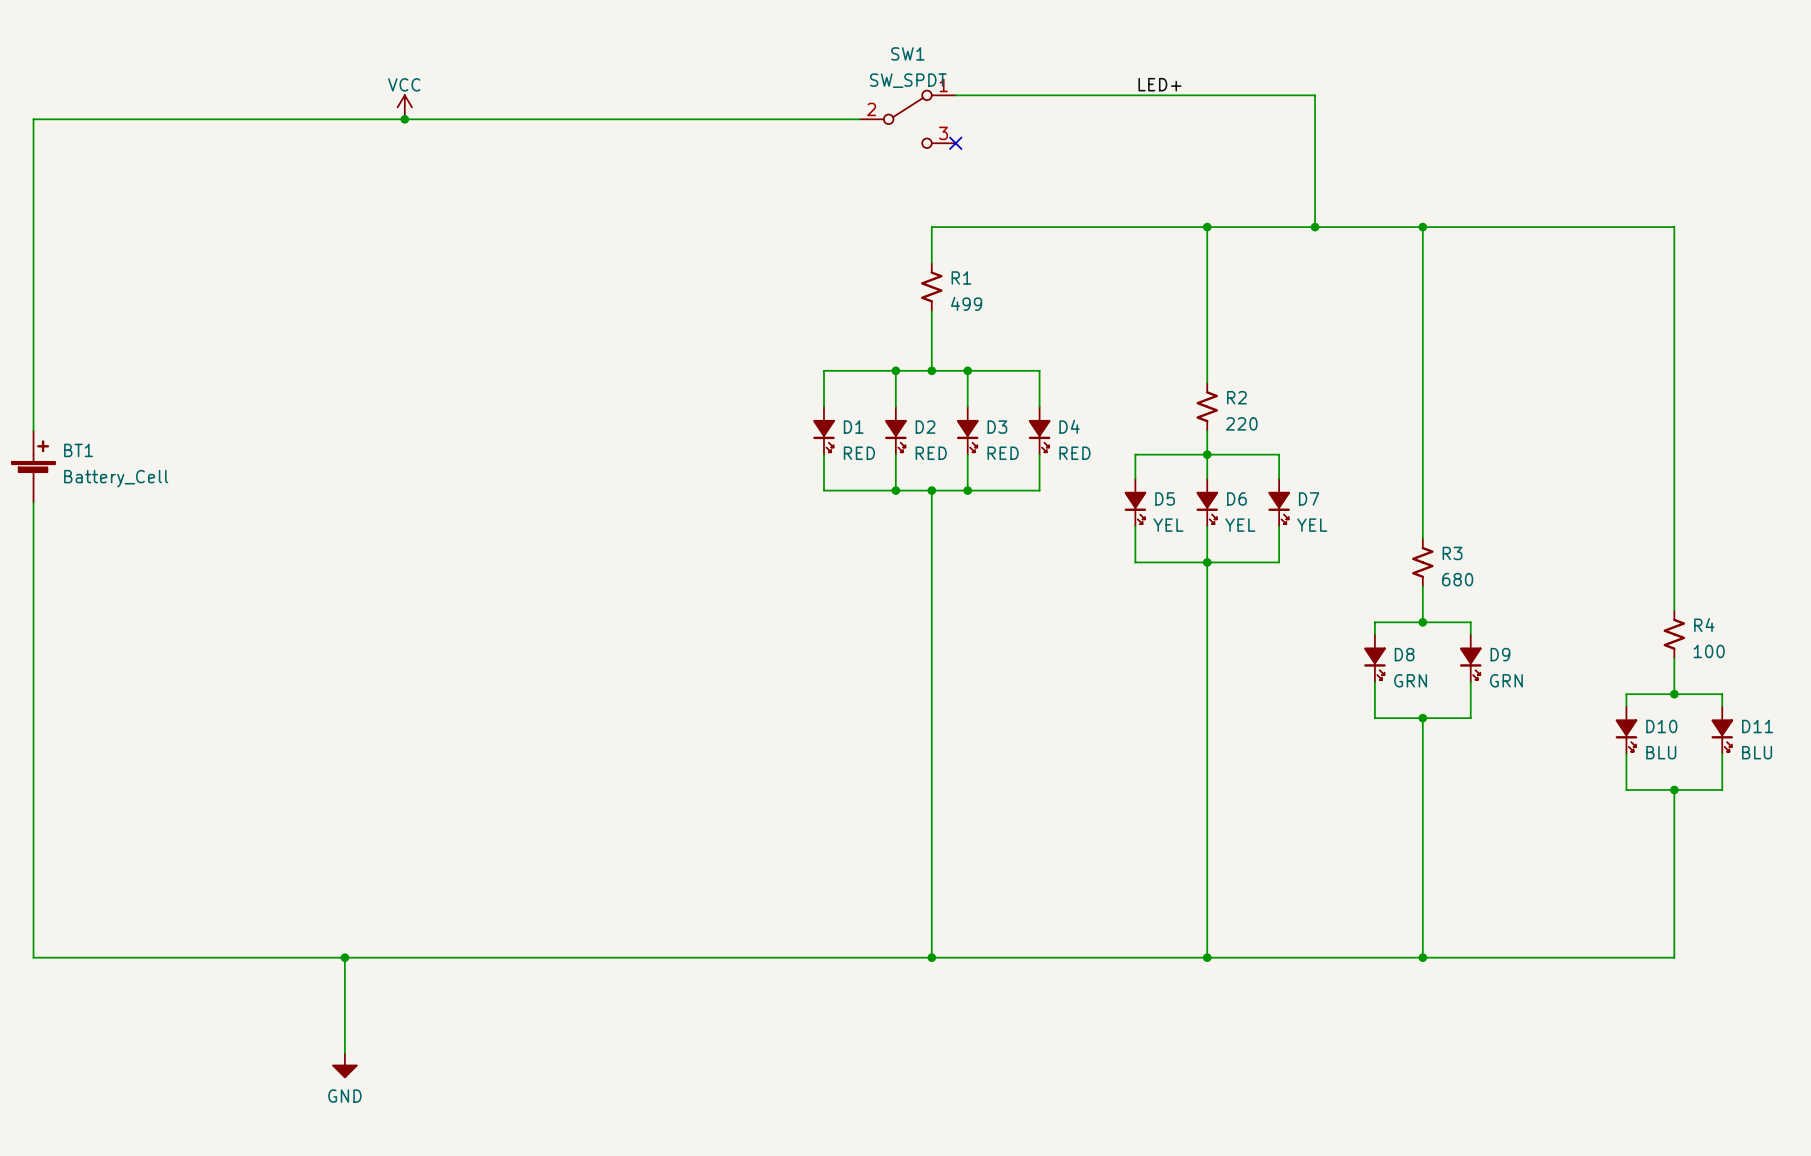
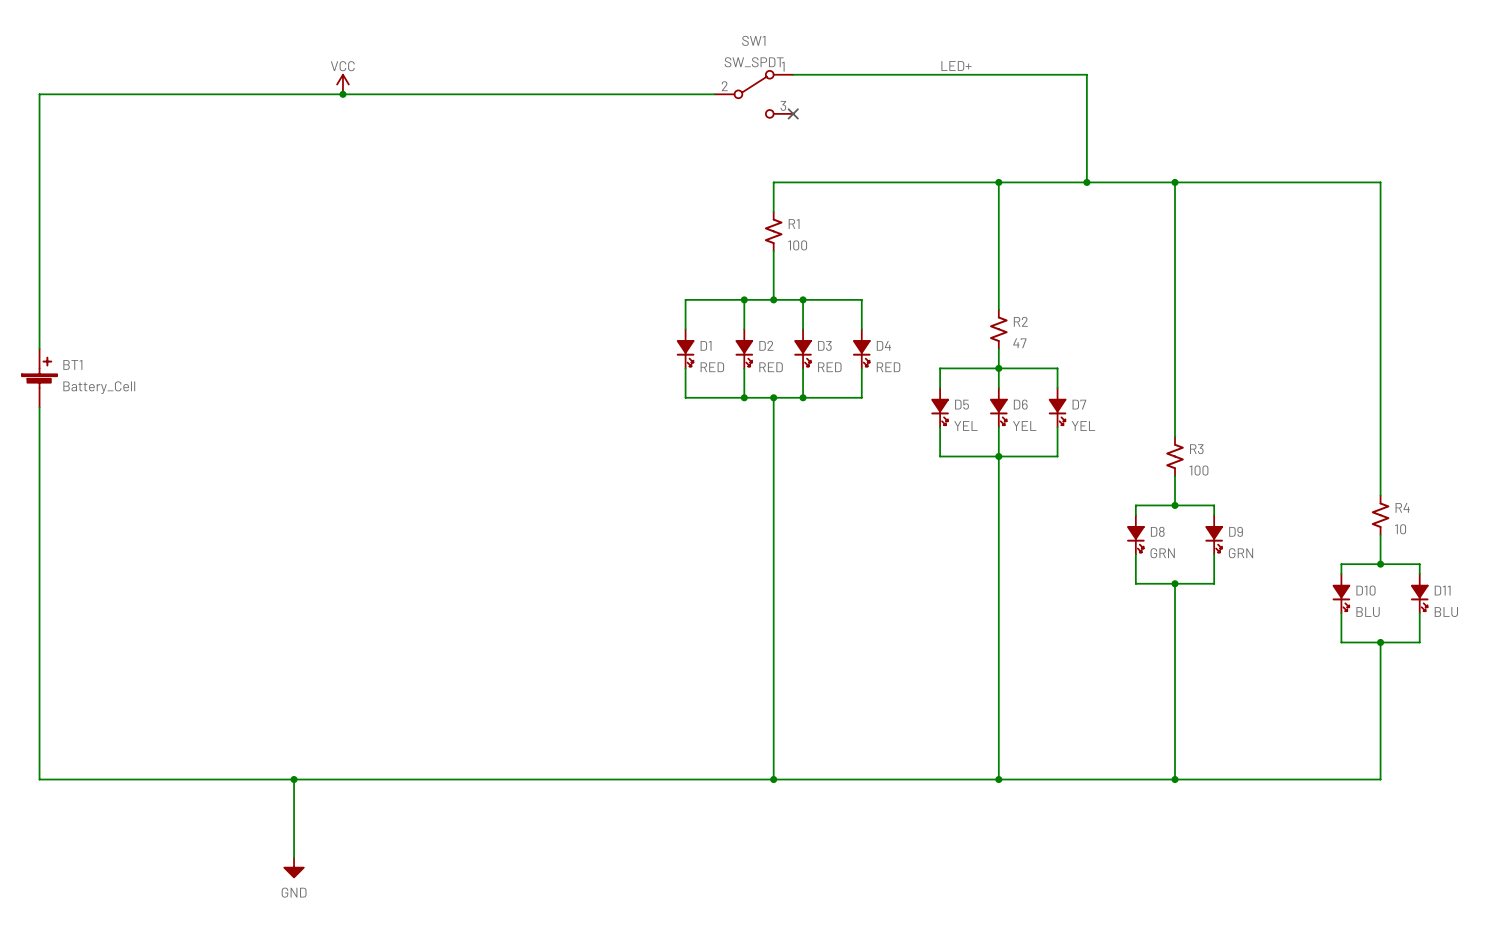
R1 value: 499 (966, 303) -> 100 (797, 245)
R2 value: 220 (1241, 423) -> 47 (1019, 343)
R3 value: 680 (1457, 579) -> 100 (1198, 470)
R4 value: 100 (1709, 651) -> 10 (1400, 529)

